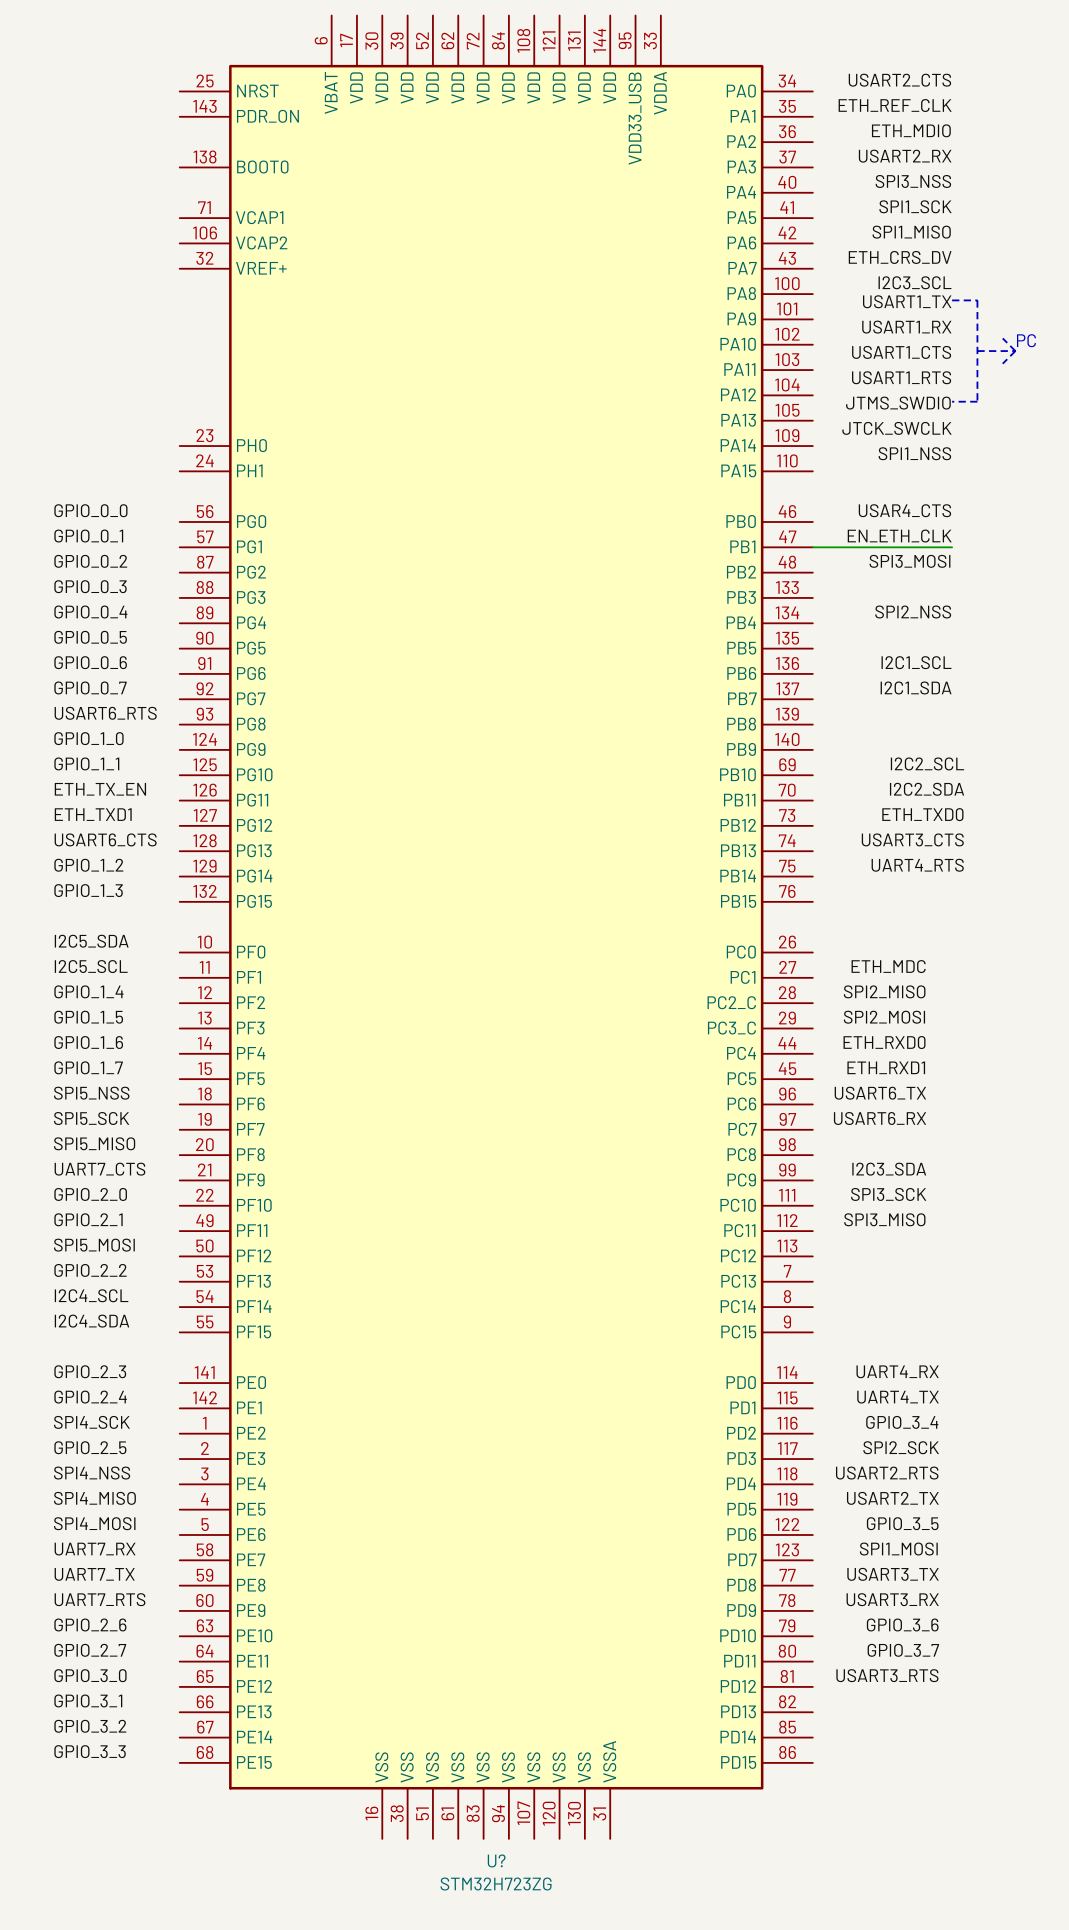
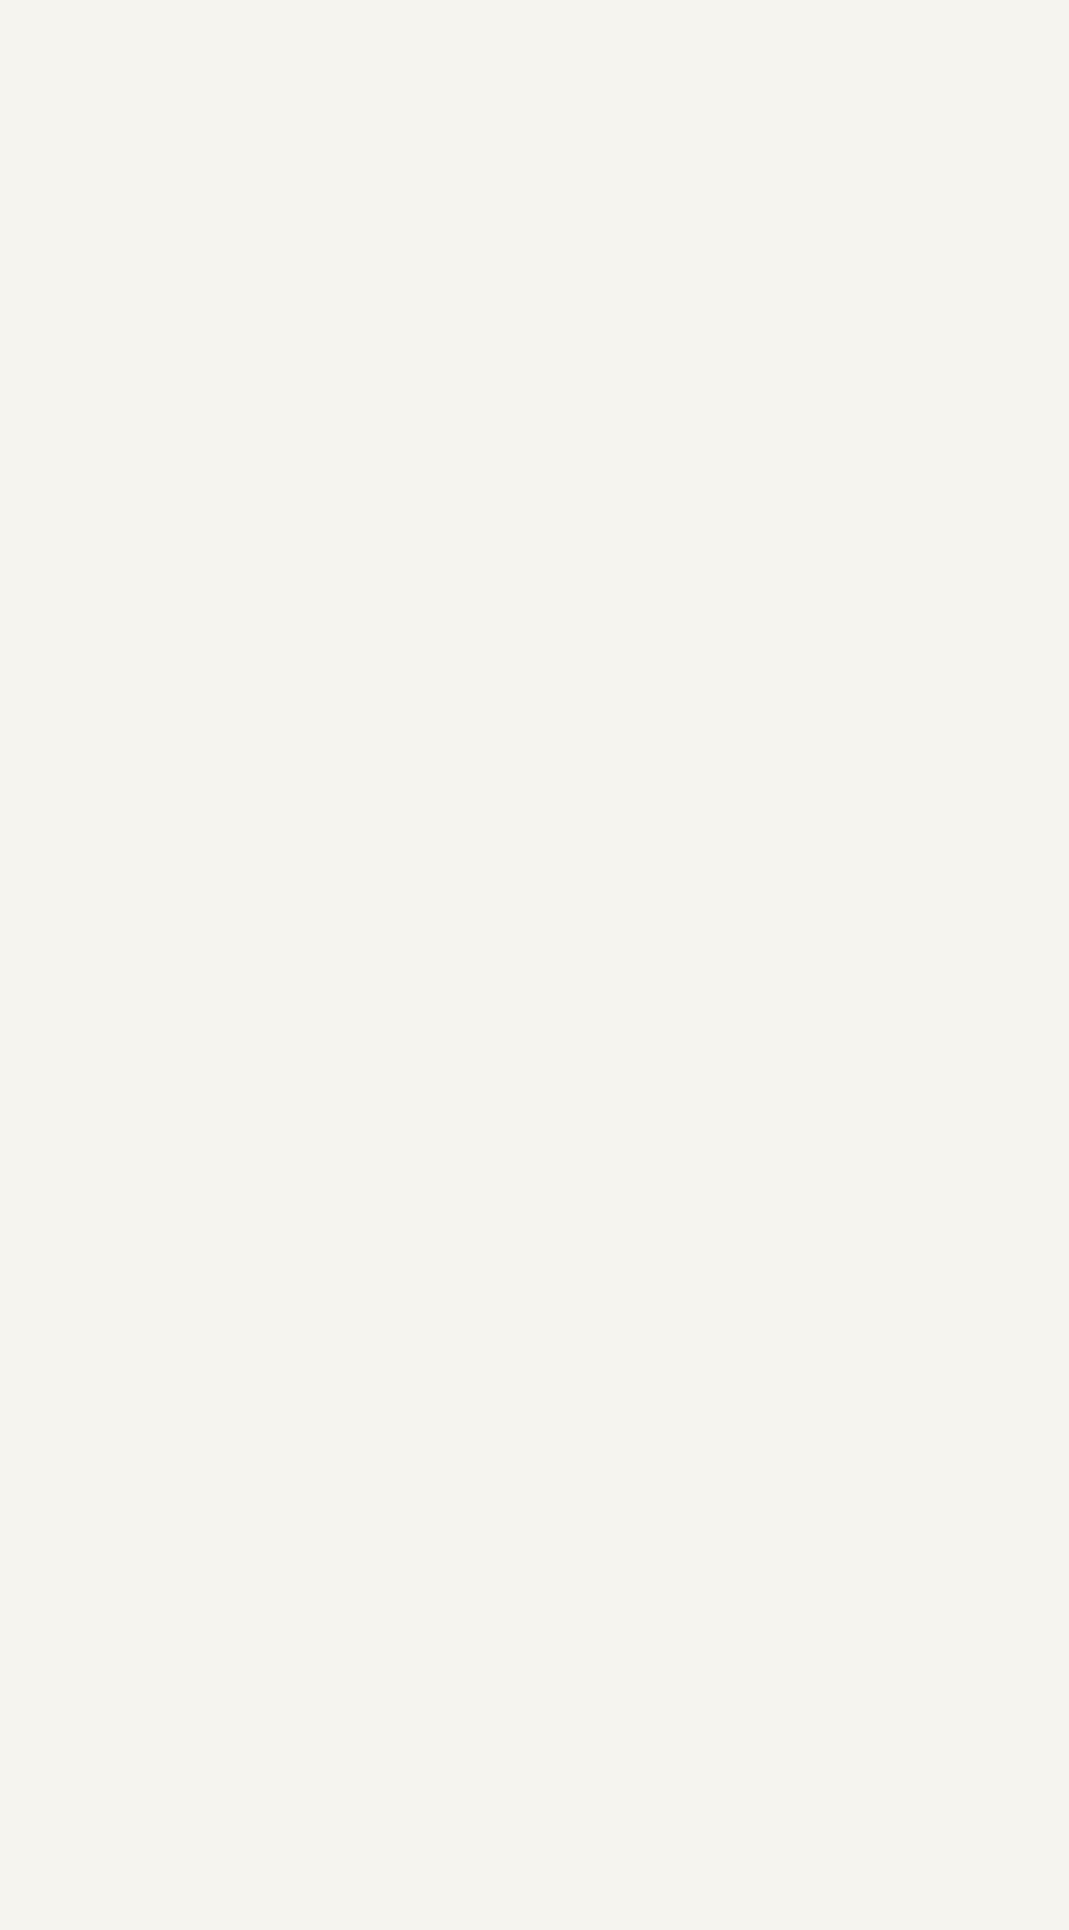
label: USART2_CTS (899, 80) -> none
label: ETH_REF_CLK (895, 105) -> none
label: ETH_MDIO (911, 130) -> none
label: USART2_RX (905, 156) -> none
label: SPI3_NSS (913, 181) -> none
label: SPI1_SCK (915, 206) -> none
label: SPI1_MISO (911, 232) -> none
label: ETH_CRS_DV (900, 257) -> none
label: I2C3_SCL (915, 282) -> none
line: (952, 300) (977, 300) (977, 401) (952, 401) -> none
label: USART1_TX (907, 301) -> none
label: USART1_RX (906, 327) -> none
line: (1002, 338) (1015, 351) -> none
text: PC (1026, 340) -> none
line: (977, 351) (1015, 351) -> none
line: (1015, 351) (1002, 363) -> none
label: USART1_CTS (901, 352) -> none
label: USART1_RTS (901, 377) -> none
label: JTMS_SWDIO (898, 403) -> none
label: JTCK_SWCLK (896, 428) -> none
label: SPI1_NSS (914, 453) -> none
label: GPIO_0_0 (90, 510) -> none
label: USAR4_CTS (904, 510) -> none
label: GPIO_0_1 (88, 536) -> none
label: EN_ETH_CLK (899, 536) -> none
wire: (812, 547) (952, 547) -> none
label: GPIO_0_2 (90, 561) -> none
label: SPI3_MOSI (909, 561) -> none
label: GPIO_0_3 (90, 586) -> none
label: GPIO_0_4 (90, 612) -> none
label: SPI2_NSS (913, 612) -> none
label: GPIO_0_5 (90, 637) -> none
label: GPIO_0_6 (90, 662) -> none
label: I2C1_SCL (916, 662) -> none
label: GPIO_0_7 (90, 687) -> none
label: I2C1_SDA (916, 687) -> none
label: USART6_RTS (105, 713) -> none
label: GPIO_1_0 (88, 738) -> none
label: GPIO_1_1 (86, 763) -> none
label: I2C2_SCL (927, 763) -> none
label: ETH_TX_EN (100, 789) -> none
label: I2C2_SDA (927, 789) -> none
label: ETH_TXD1 (93, 814) -> none
label: ETH_TXD0 (922, 814) -> none
label: USART6_CTS (105, 839) -> none
label: USART3_CTS (912, 839) -> none
label: GPIO_1_2 (88, 865) -> none
label: UART4_RTS (917, 865) -> none
label: GPIO_1_3 (88, 890) -> none
U?: STM32H723ZG (496, 927) -> none
label: I2C5_SDA (91, 941) -> none
label: I2C5_SCL (91, 966) -> none
label: ETH_MDC (888, 966) -> none
label: GPIO_1_4 (88, 991) -> none
label: SPI2_MISO (884, 991) -> none
label: GPIO_1_5 (88, 1017) -> none
label: SPI2_MOSI (884, 1017) -> none
label: GPIO_1_6 (88, 1042) -> none
label: ETH_RXD0 (884, 1042) -> none
label: GPIO_1_7 (88, 1067) -> none
label: ETH_RXD1 (886, 1067) -> none
label: SPI5_NSS (91, 1093) -> none
label: USART6_TX (880, 1093) -> none
label: SPI5_SCK (91, 1118) -> none
label: USART6_RX (880, 1118) -> none
label: SPI5_MISO (94, 1143) -> none
label: UART7_CTS (99, 1169) -> none
label: I2C3_SDA (889, 1169) -> none
label: GPIO_2_0 (90, 1194) -> none
label: SPI3_SCK (888, 1194) -> none
label: GPIO_2_1 (88, 1219) -> none
label: SPI3_MISO (884, 1219) -> none
label: SPI5_MOSI (94, 1245) -> none
label: GPIO_2_2 (90, 1270) -> none
label: I2C4_SCL (91, 1295) -> none
label: I2C4_SDA (92, 1321) -> none
label: GPIO_2_3 (90, 1371) -> none
label: UART4_RX (897, 1371) -> none
label: GPIO_2_4 (90, 1397) -> none
label: UART4_TX (898, 1397) -> none
label: SPI4_SCK (91, 1422) -> none
label: GPIO_3_4 (902, 1422) -> none
label: GPIO_2_5 (90, 1447) -> none
label: SPI2_SCK (901, 1447) -> none
label: SPI4_NSS (92, 1473) -> none
label: USART2_RTS (887, 1473) -> none
label: SPI4_MISO (94, 1498) -> none
label: USART2_TX (892, 1498) -> none
label: SPI4_MOSI (94, 1523) -> none
label: GPIO_3_5 (902, 1523) -> none
label: UART7_RX (95, 1549) -> none
label: SPI1_MOSI (898, 1549) -> none
label: UART7_TX (94, 1574) -> none
label: USART3_TX (893, 1574) -> none
label: UART7_RTS (100, 1599) -> none
label: USART3_RX (892, 1599) -> none
label: GPIO_2_6 (90, 1624) -> none
label: GPIO_3_6 (902, 1624) -> none
label: GPIO_2_7 (90, 1650) -> none
label: GPIO_3_7 (903, 1650) -> none
label: GPIO_3_0 (90, 1675) -> none
label: USART3_RTS (887, 1675) -> none
label: GPIO_3_1 (88, 1700) -> none
label: GPIO_3_2 (90, 1726) -> none
label: GPIO_3_3 (90, 1751) -> none

